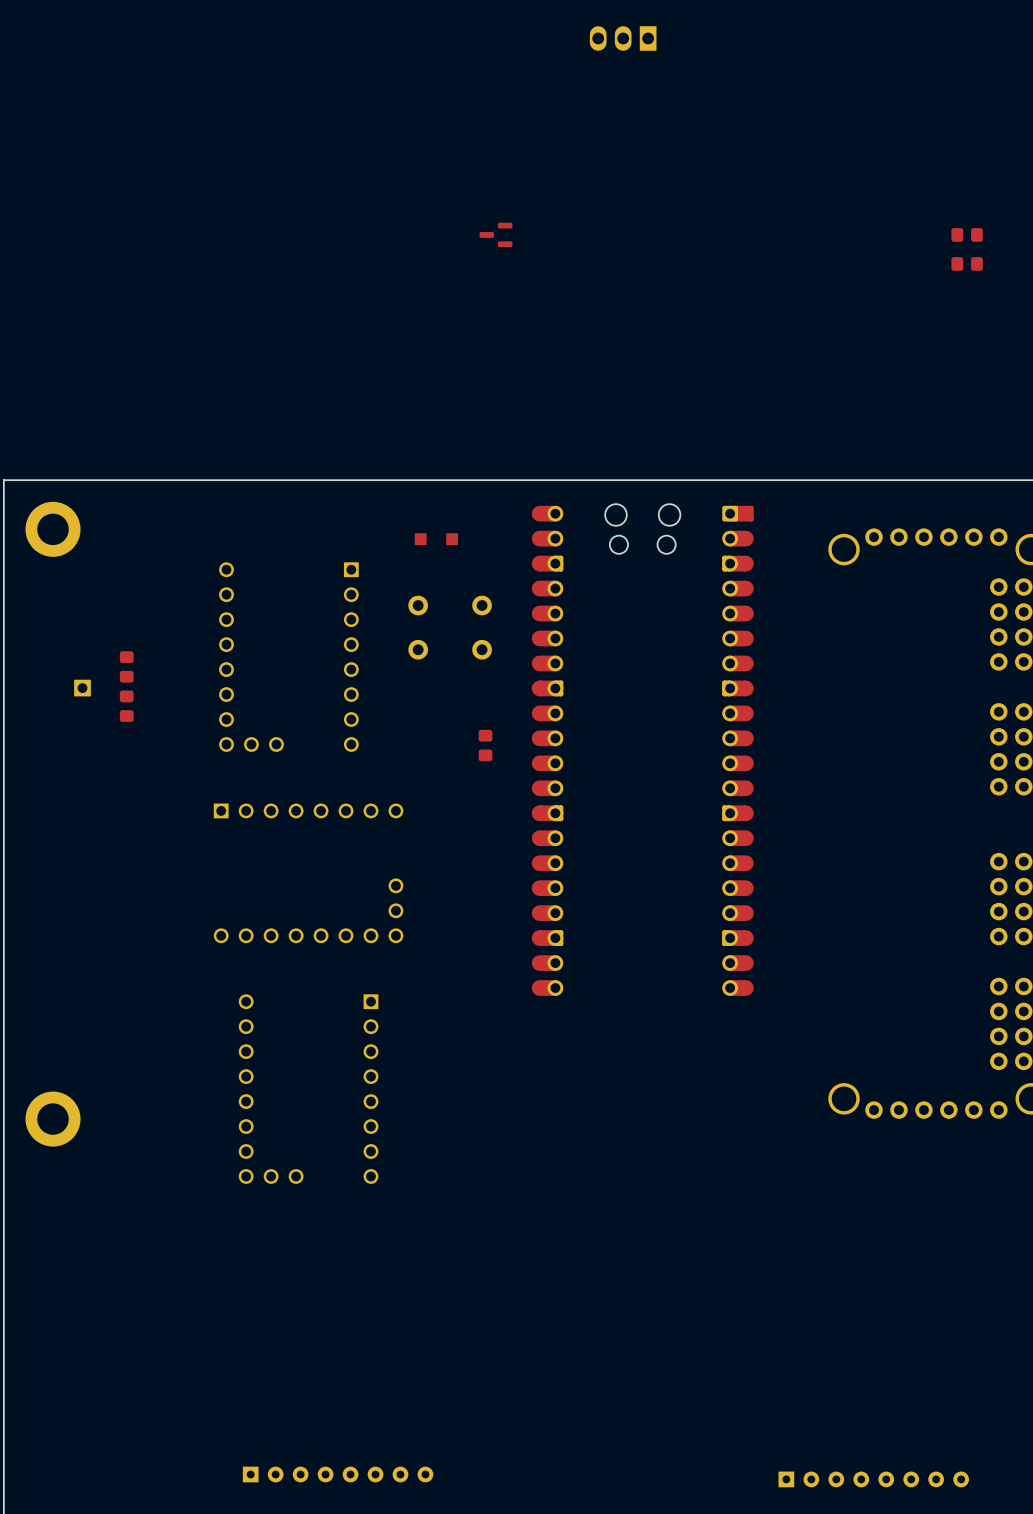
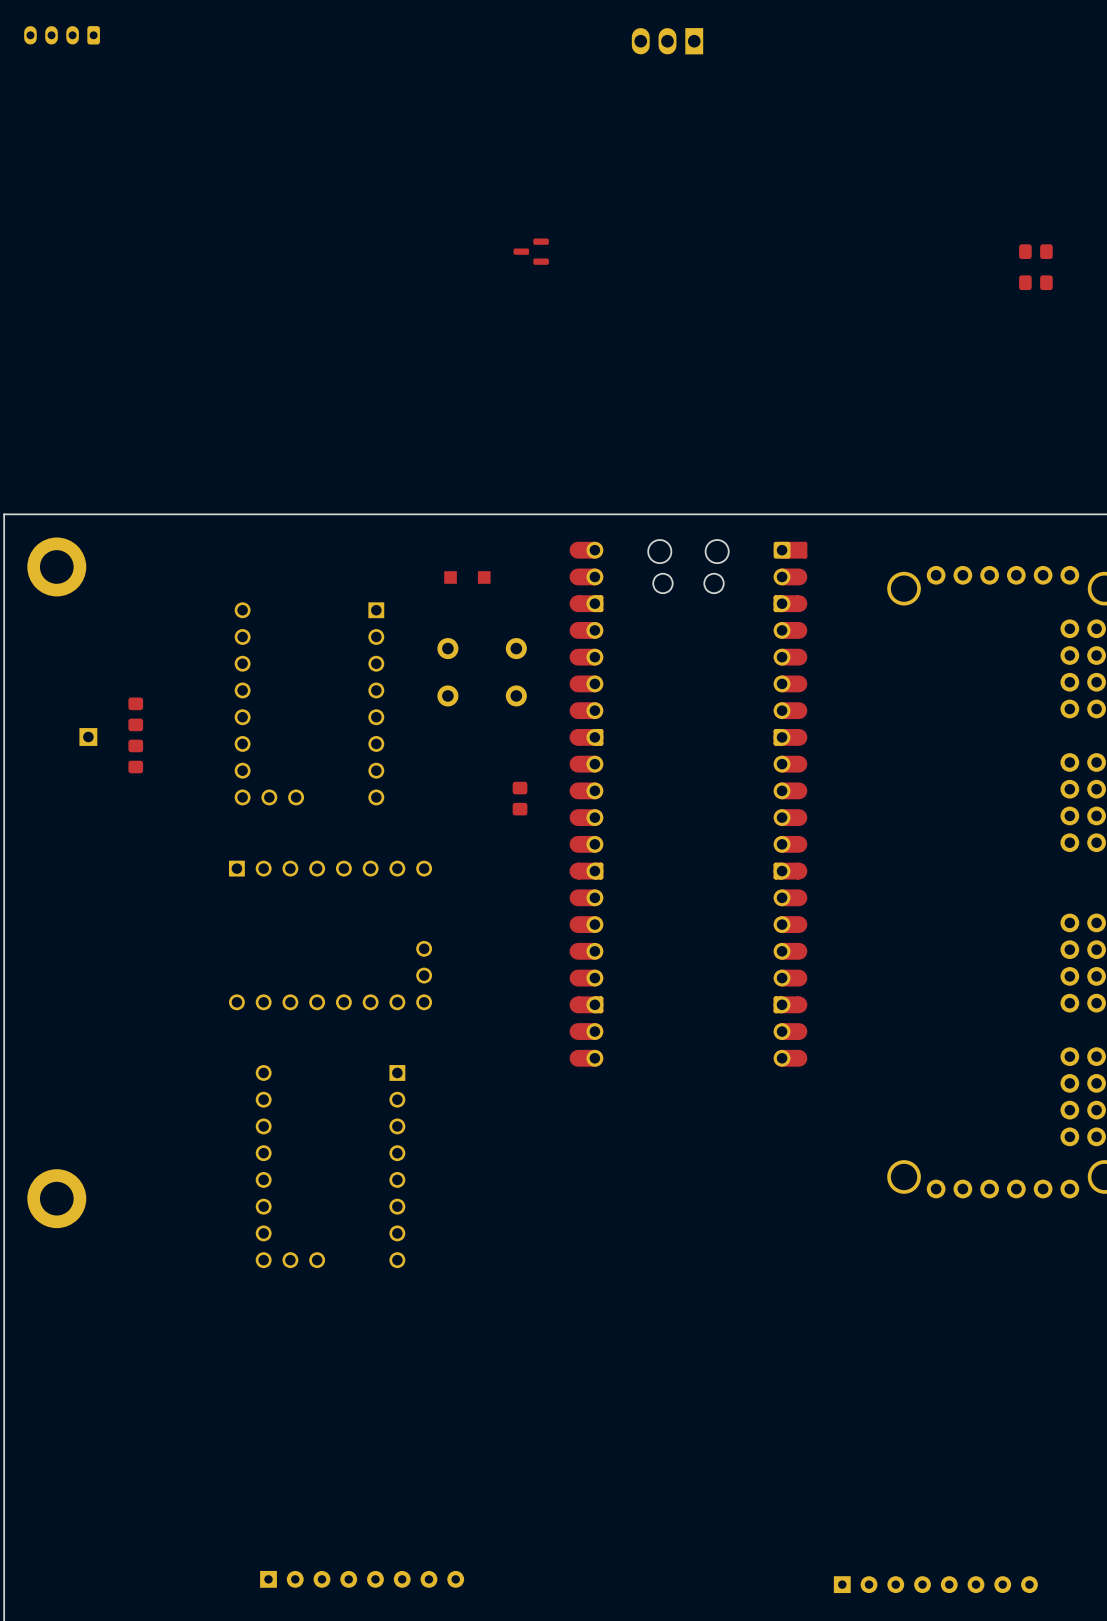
part: none -> (62, 35)

